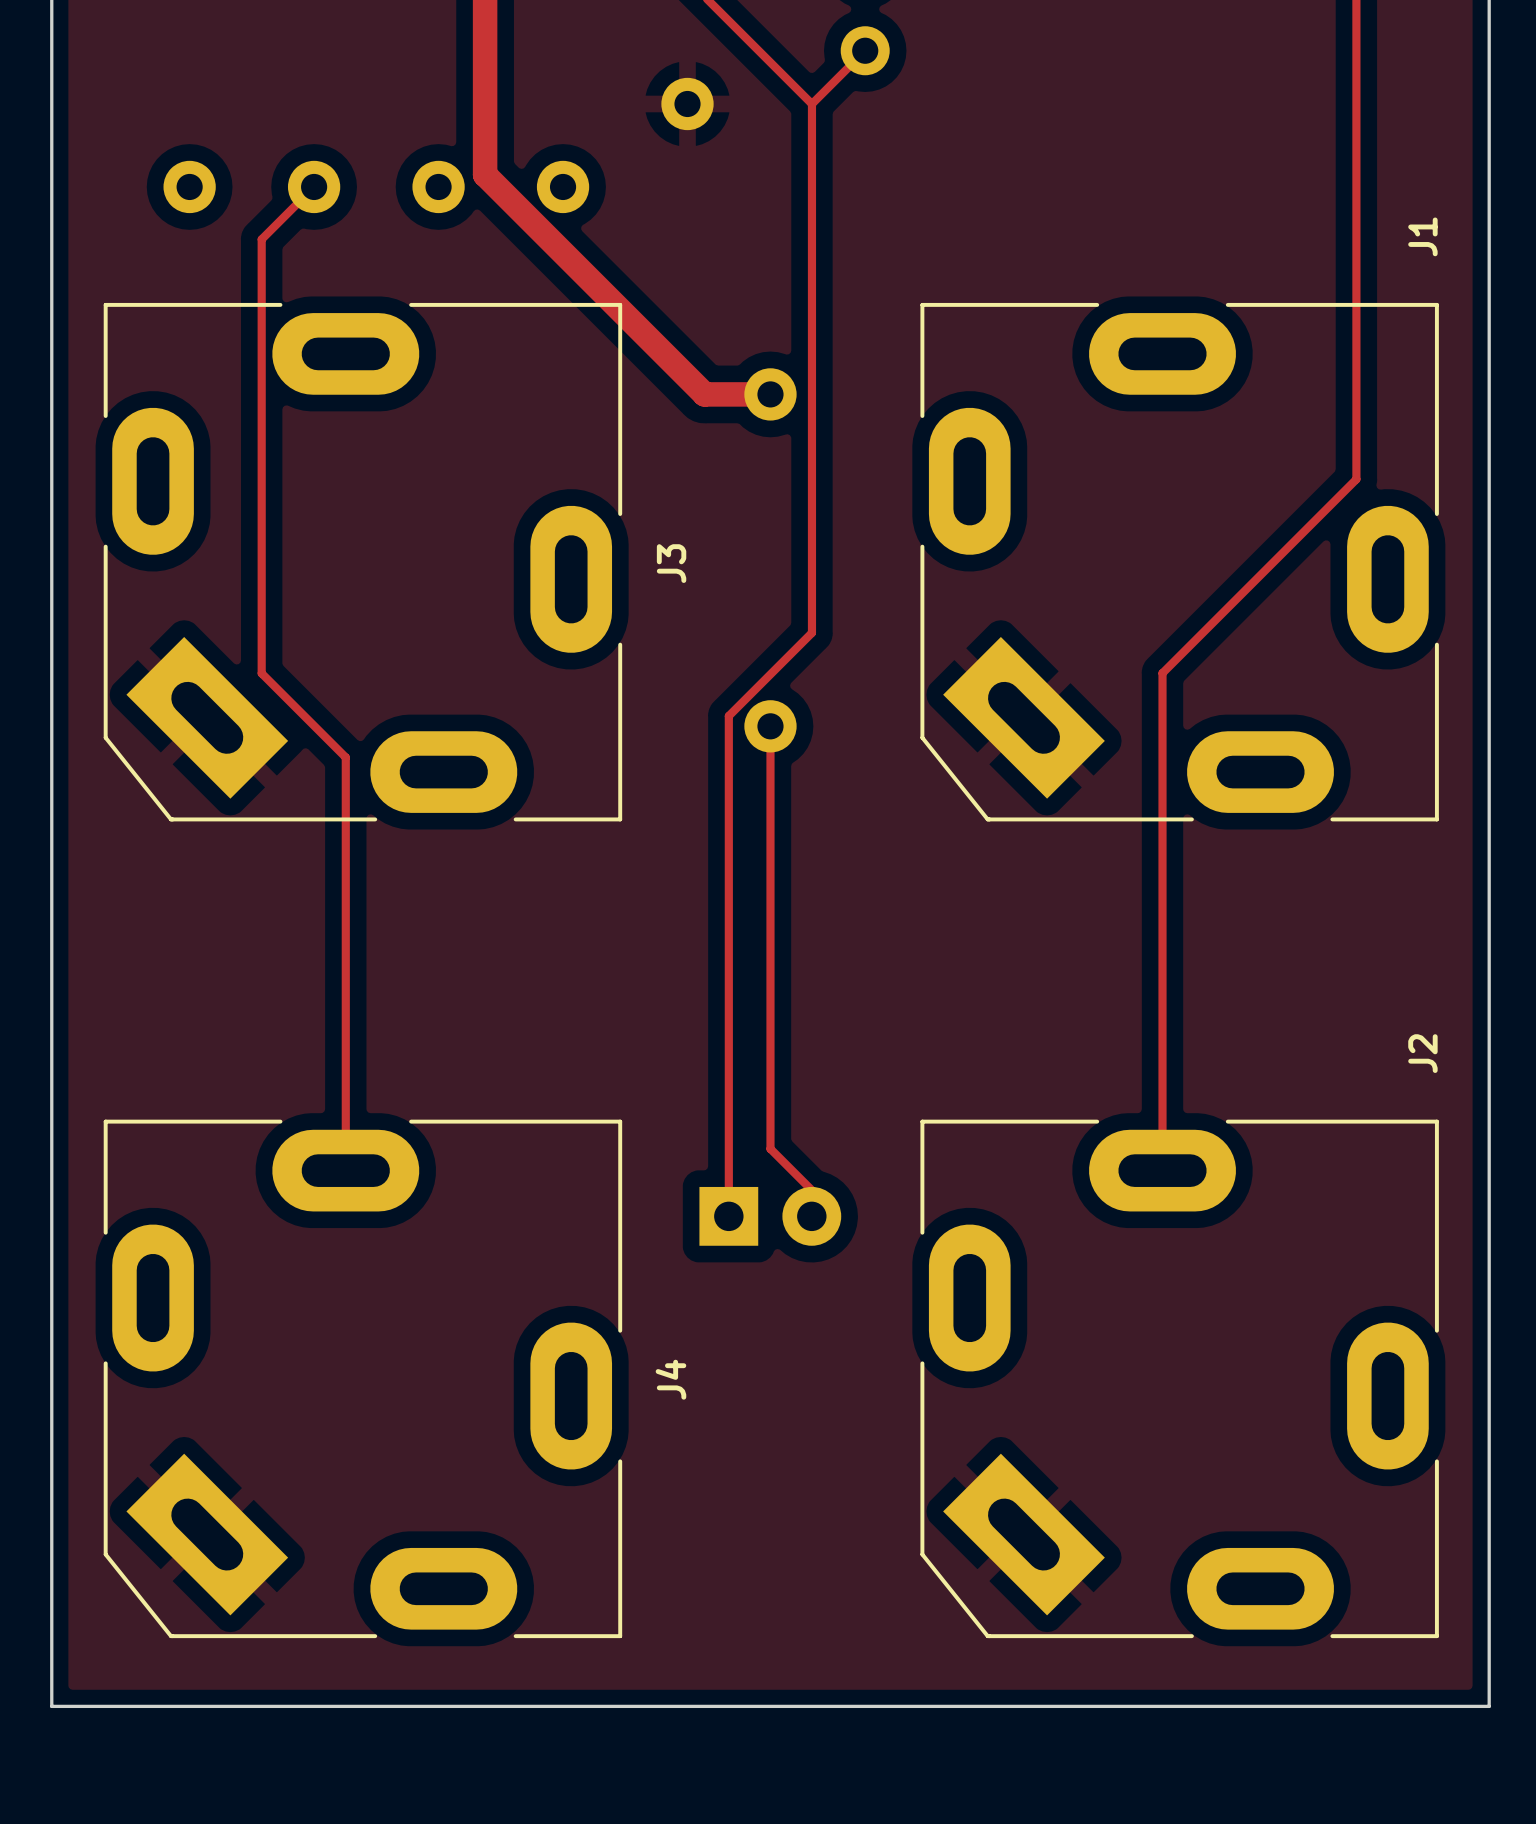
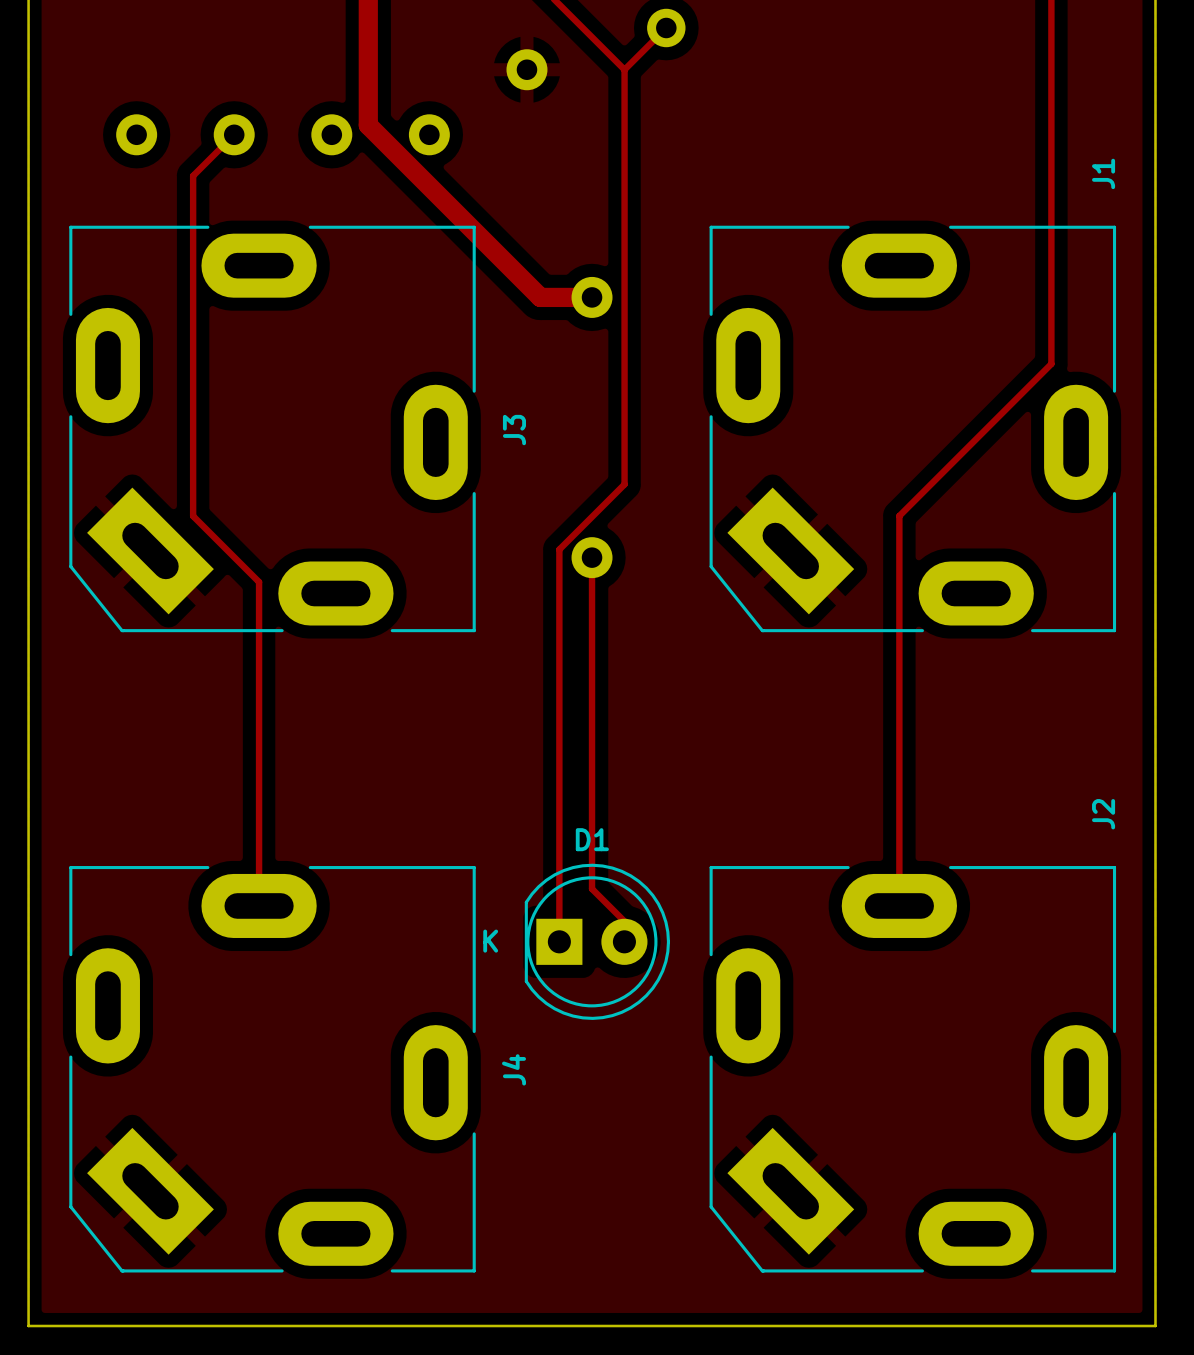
D1 side: bottom (770, 1216) -> top (597, 941)

